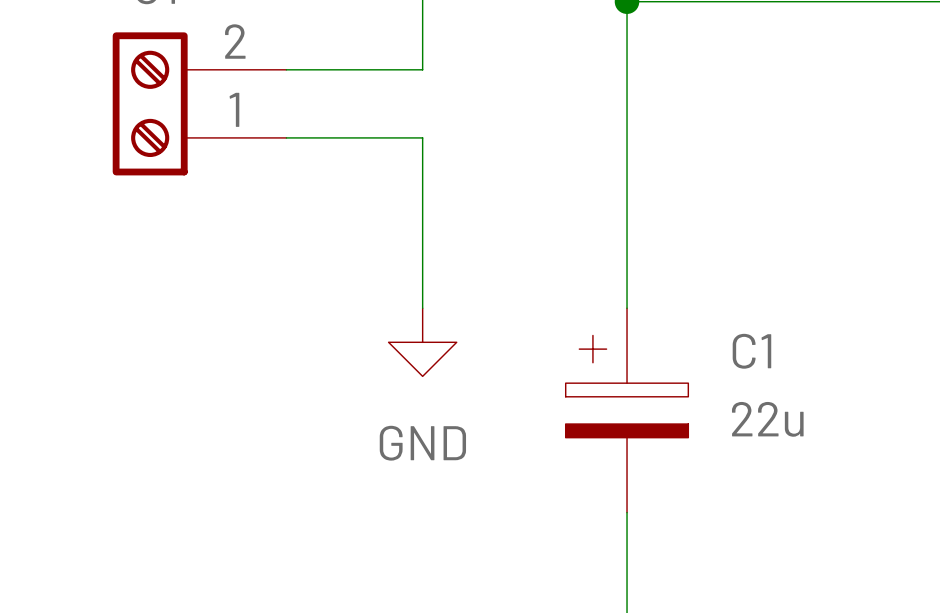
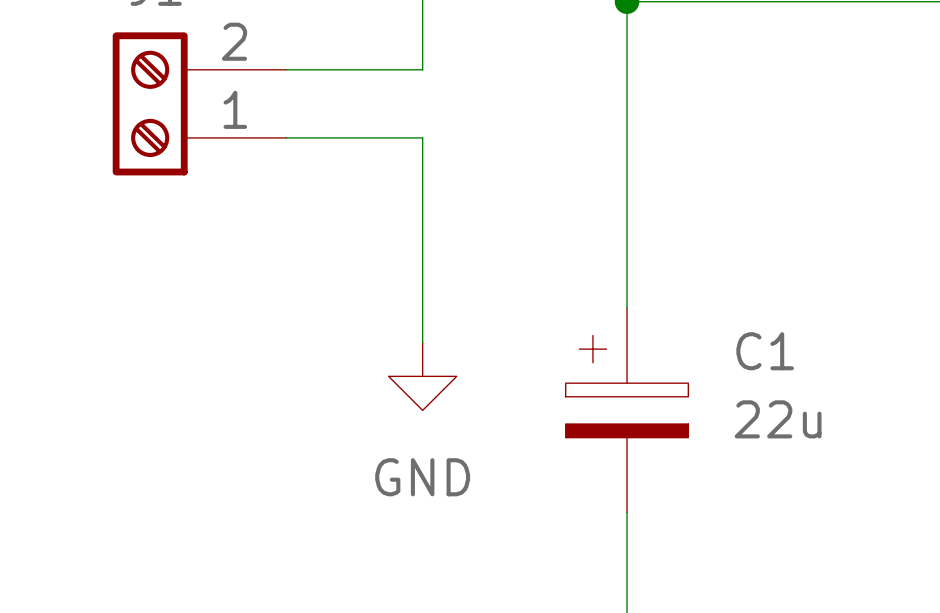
power symbol position: GND (422, 342) -> GND (422, 376)

